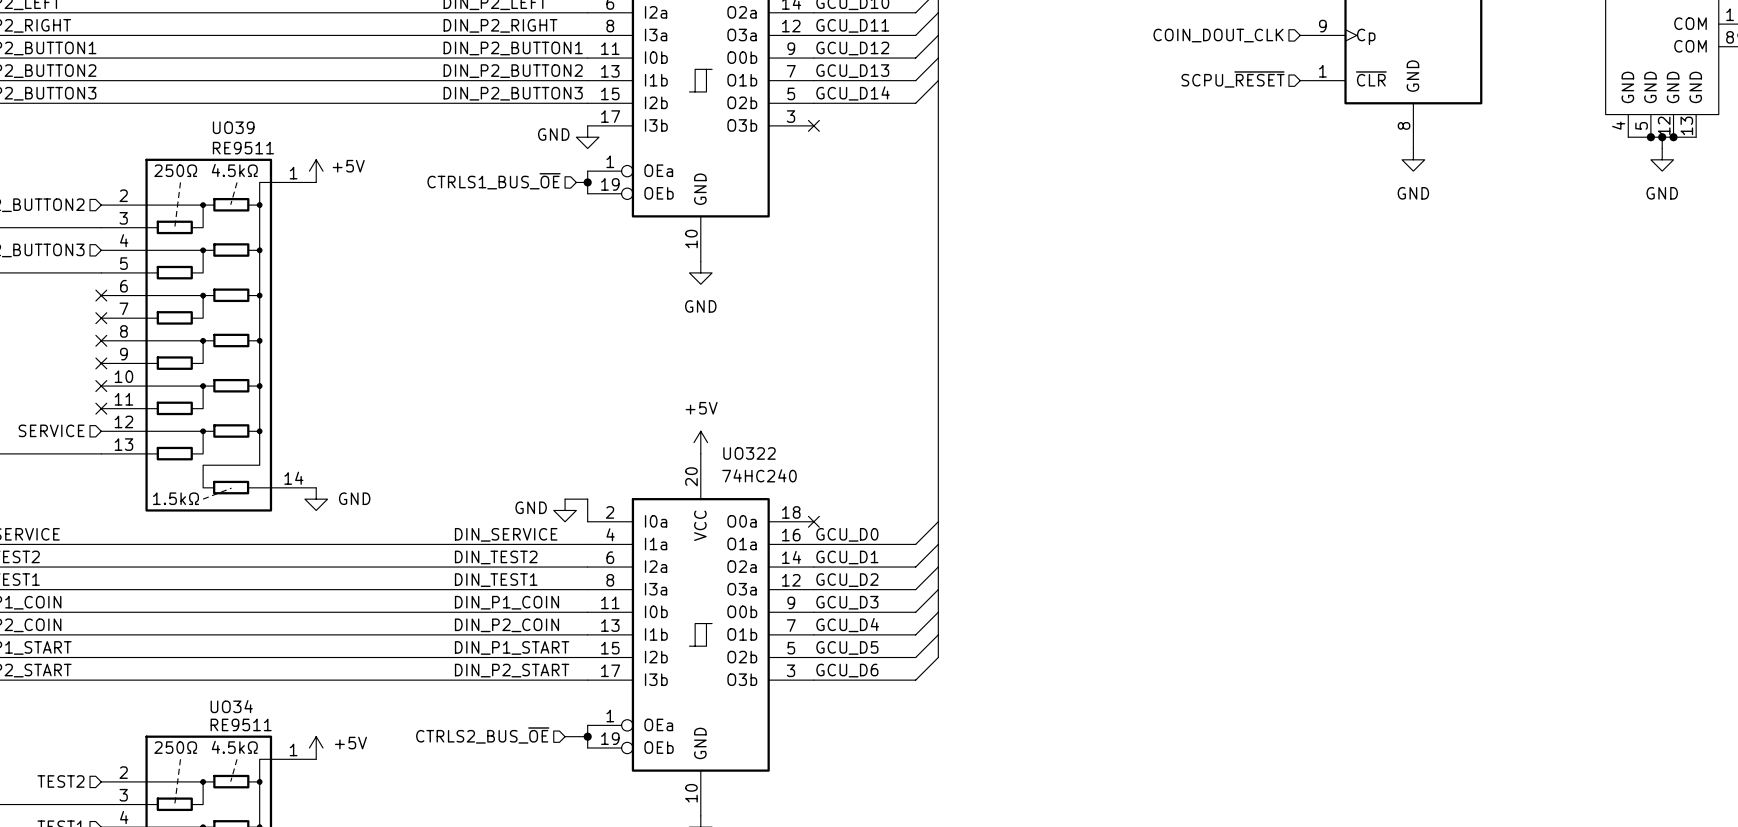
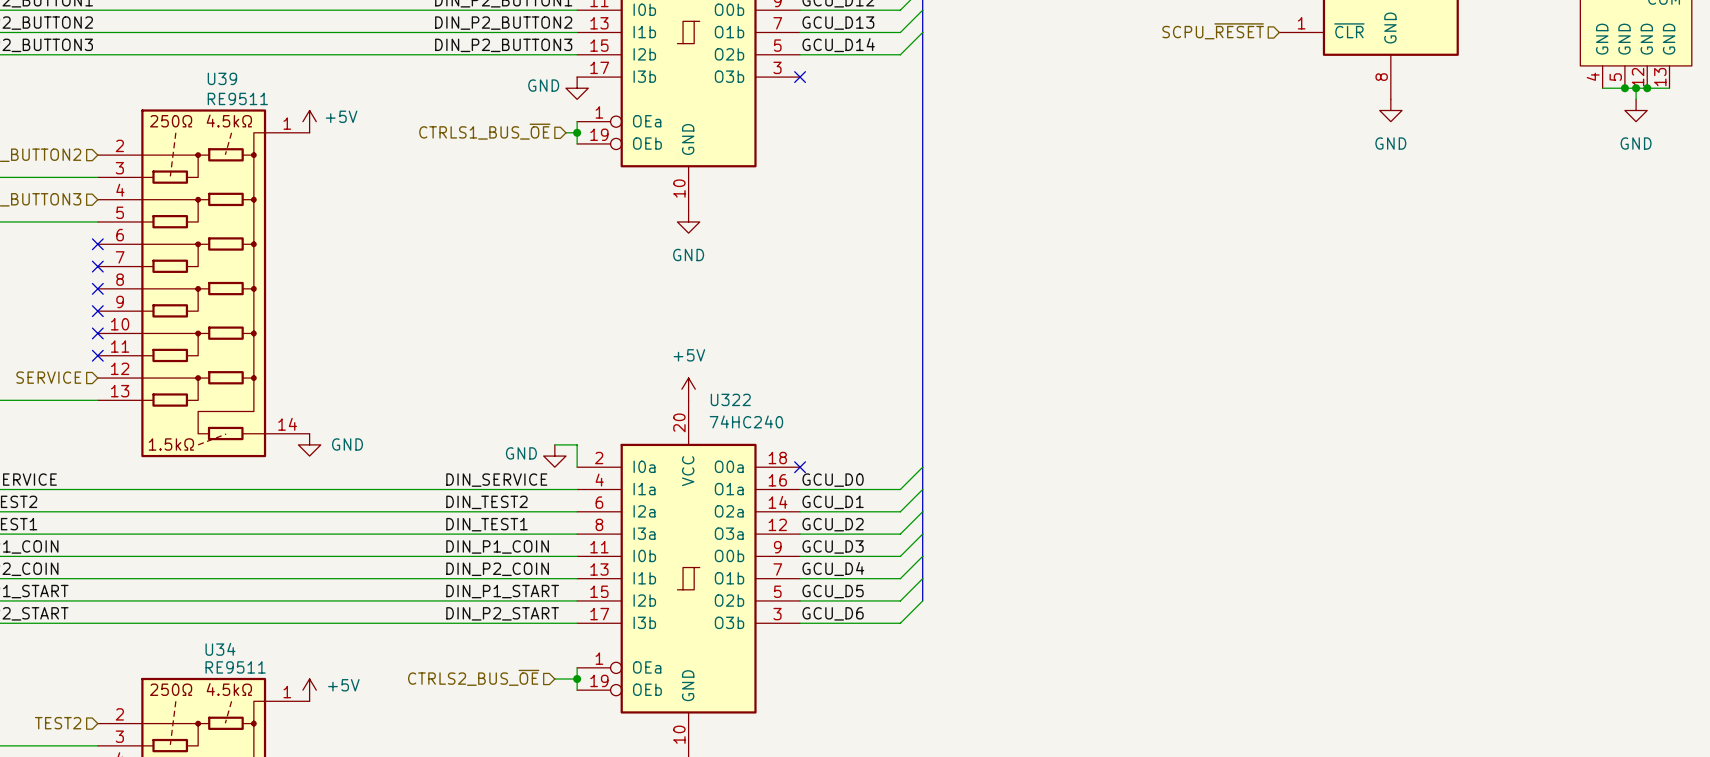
UO39 name: UO39 (233, 127) -> U39 (222, 78)
UO322 name: UO322 (749, 453) -> U322 (730, 399)
UO34 name: UO34 (231, 706) -> U34 (220, 649)

